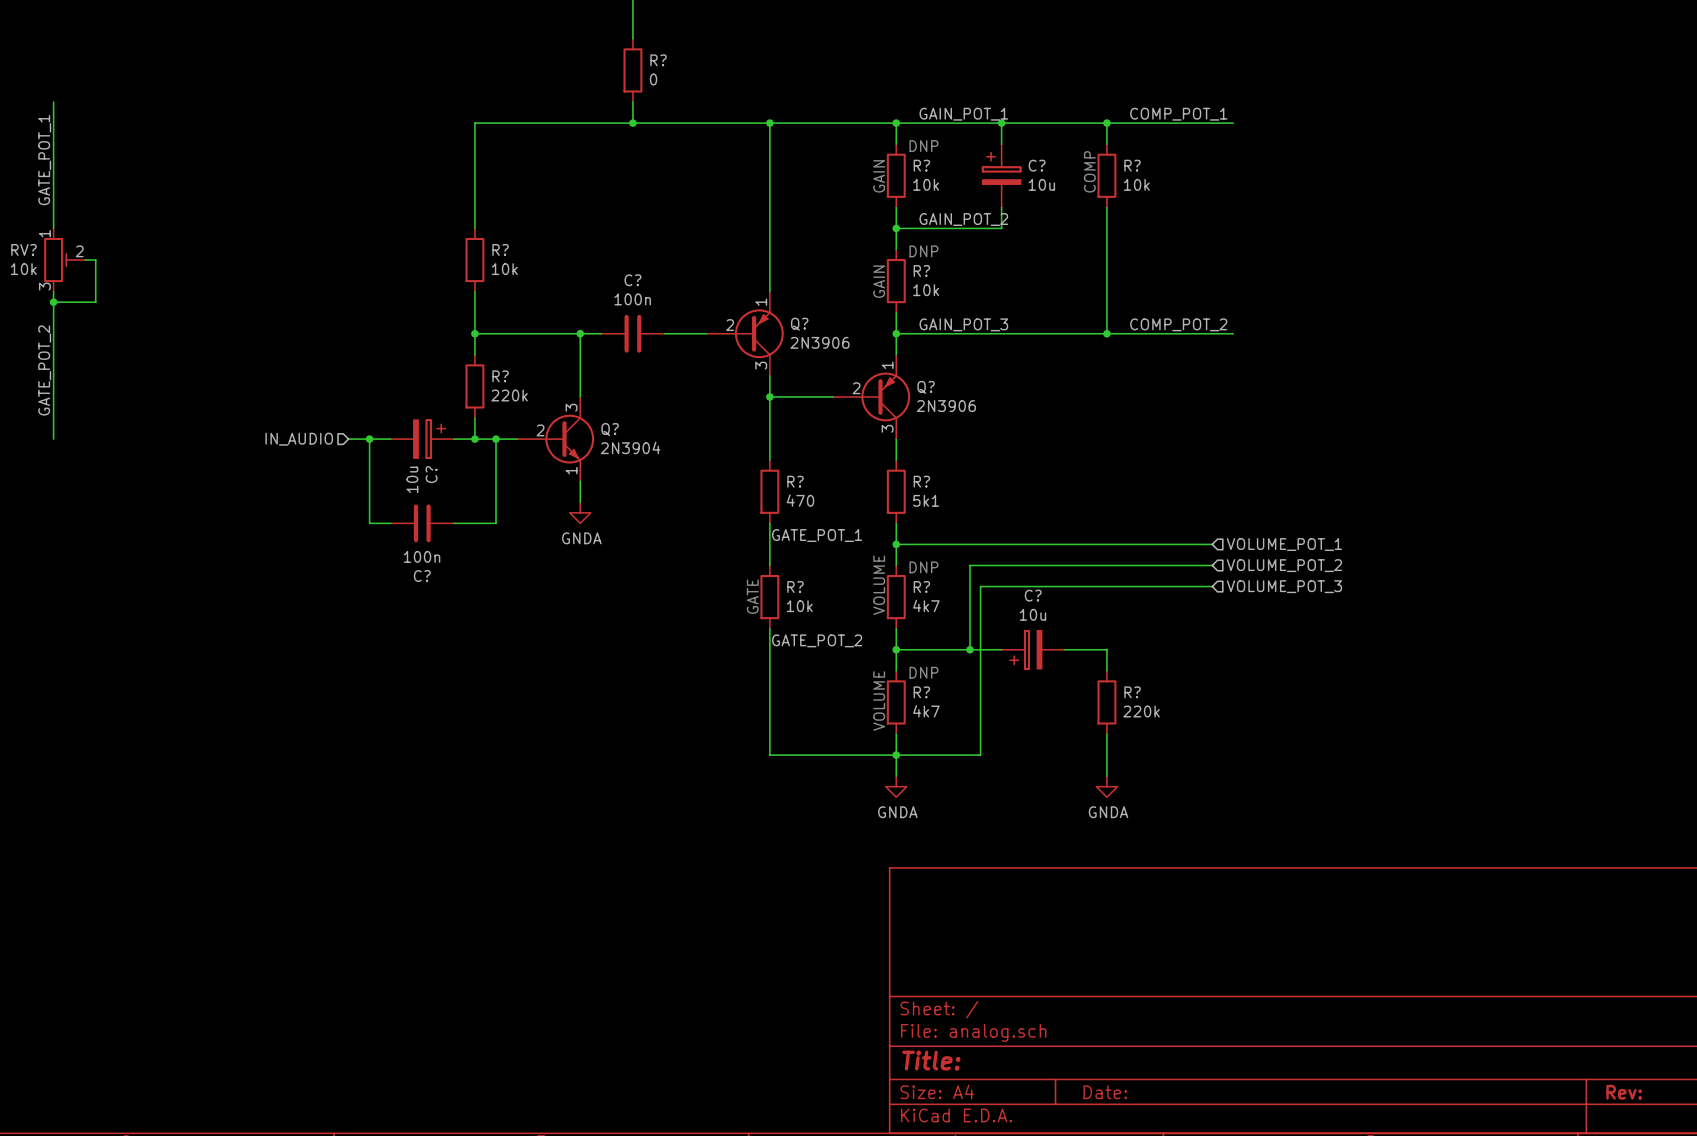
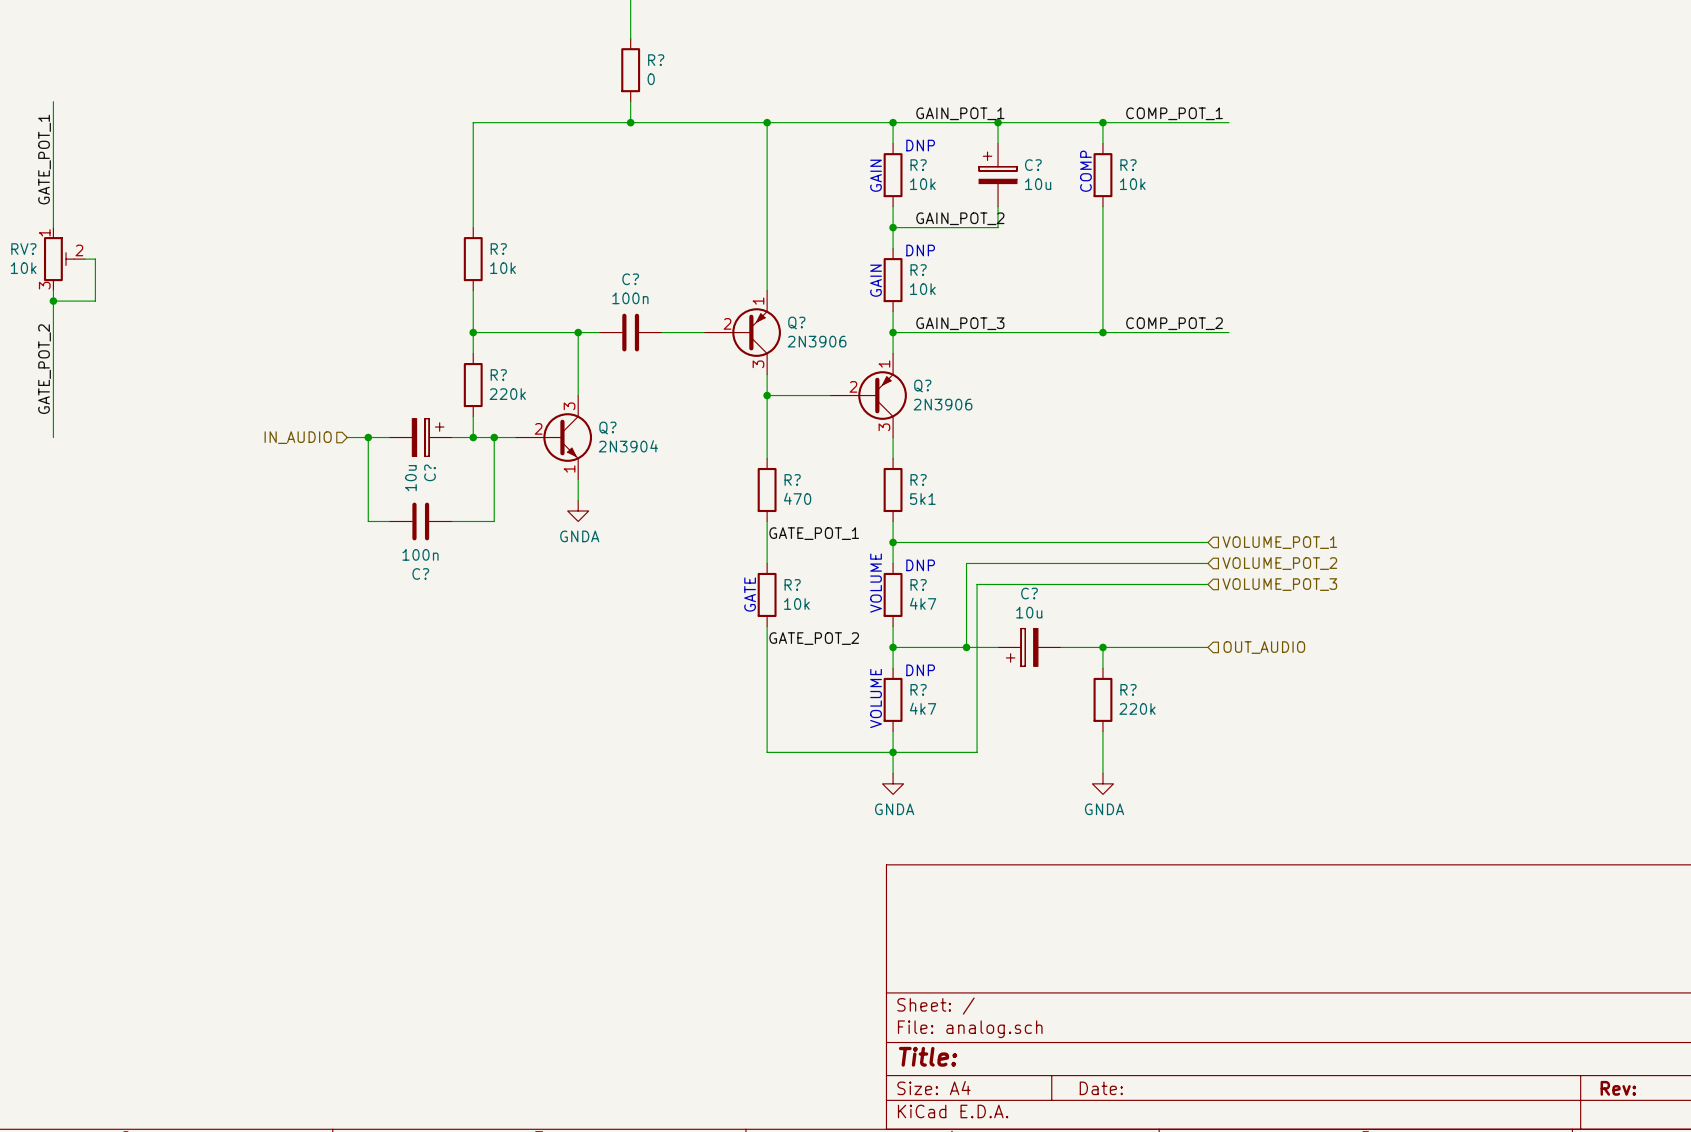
wire: none -> (1102, 647) (1207, 647)
junction: none -> (1102, 647)
hierarchical label: none -> OUT_AUDIO (1264, 647)

